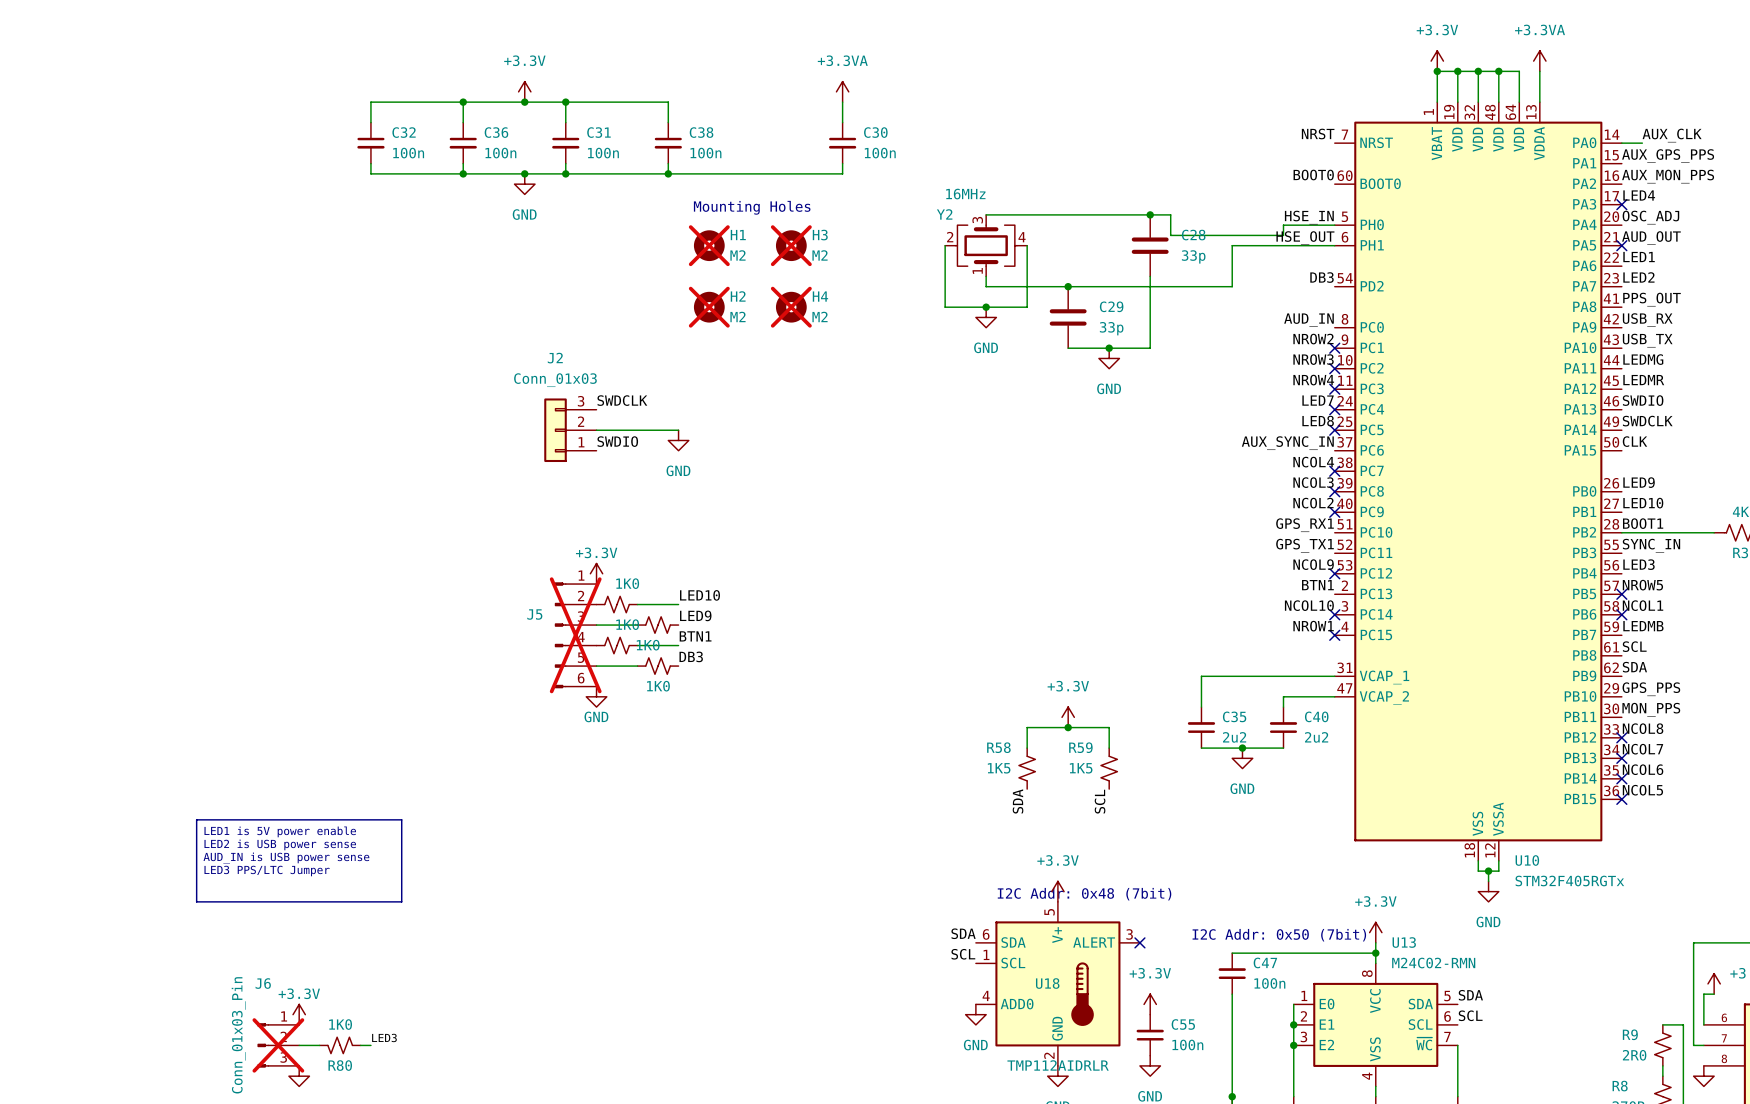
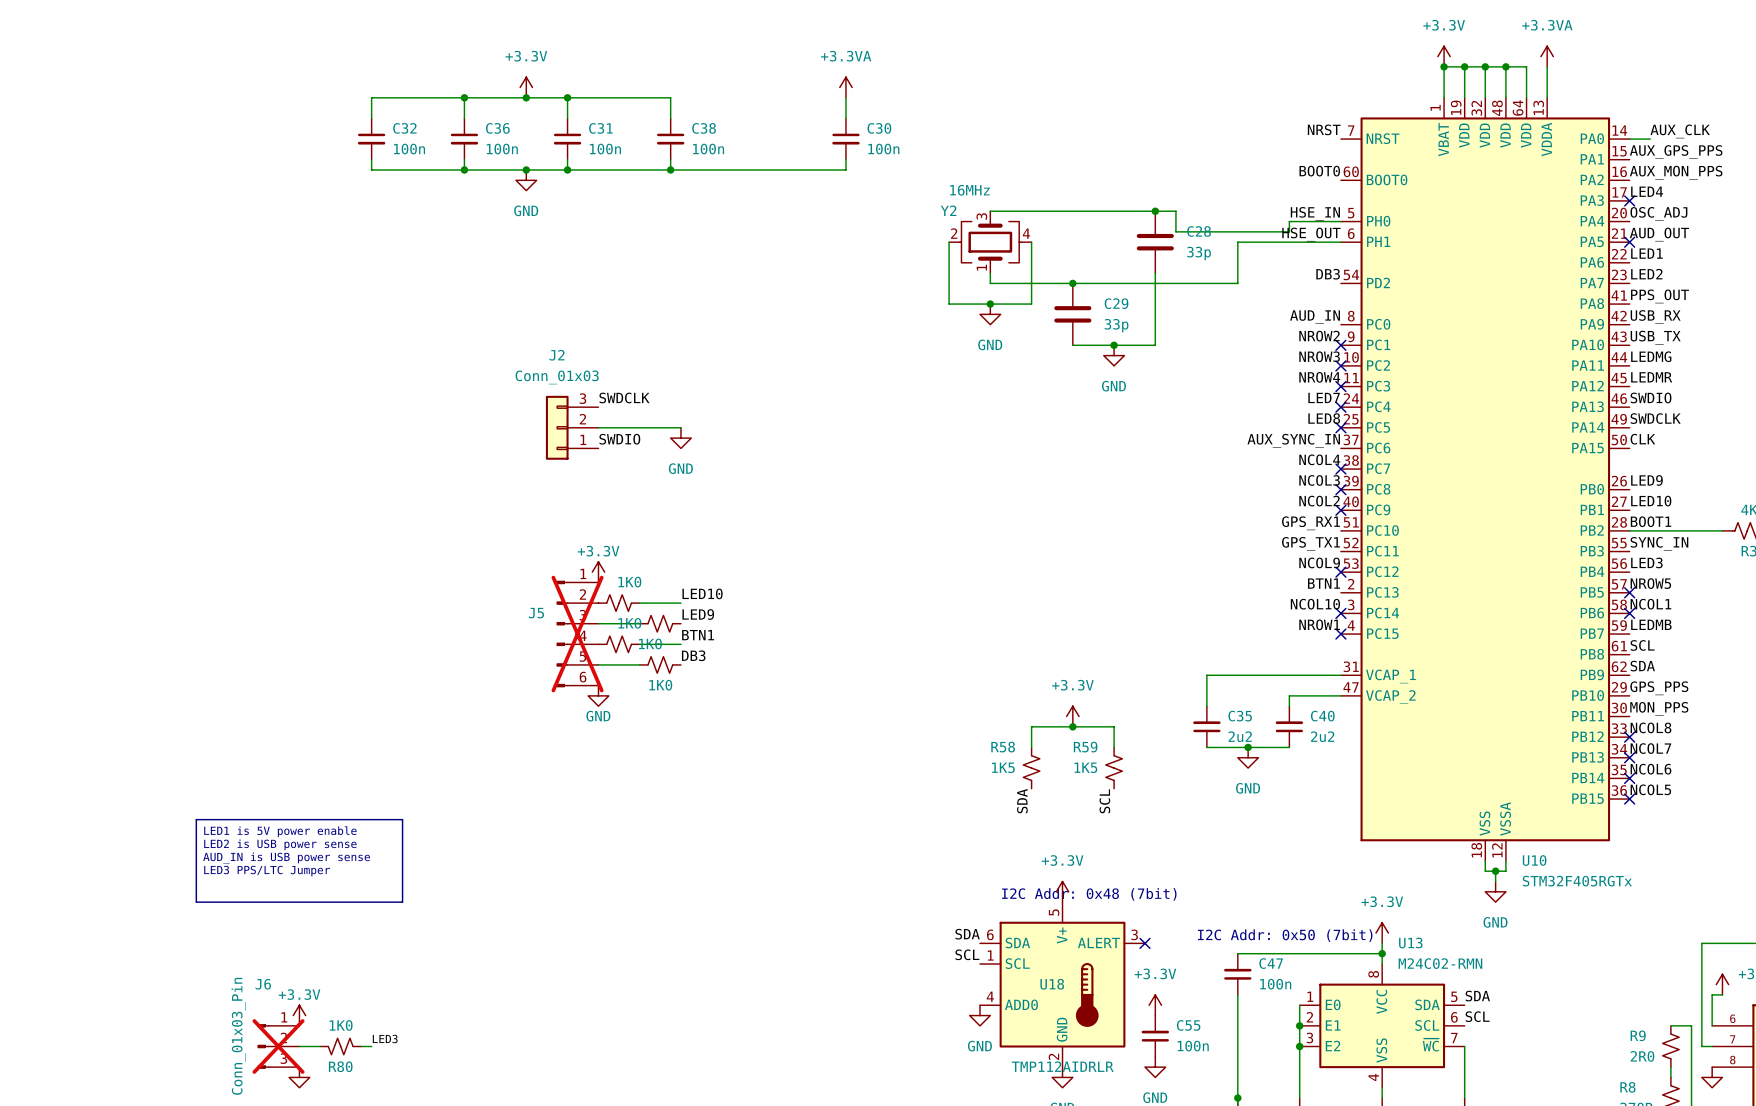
text: Mounting Holes (752, 207) -> none
H1: M2 (709, 245) -> none
H3: M2 (791, 245) -> none
H2: M2 (709, 307) -> none
H4: M2 (791, 307) -> none

